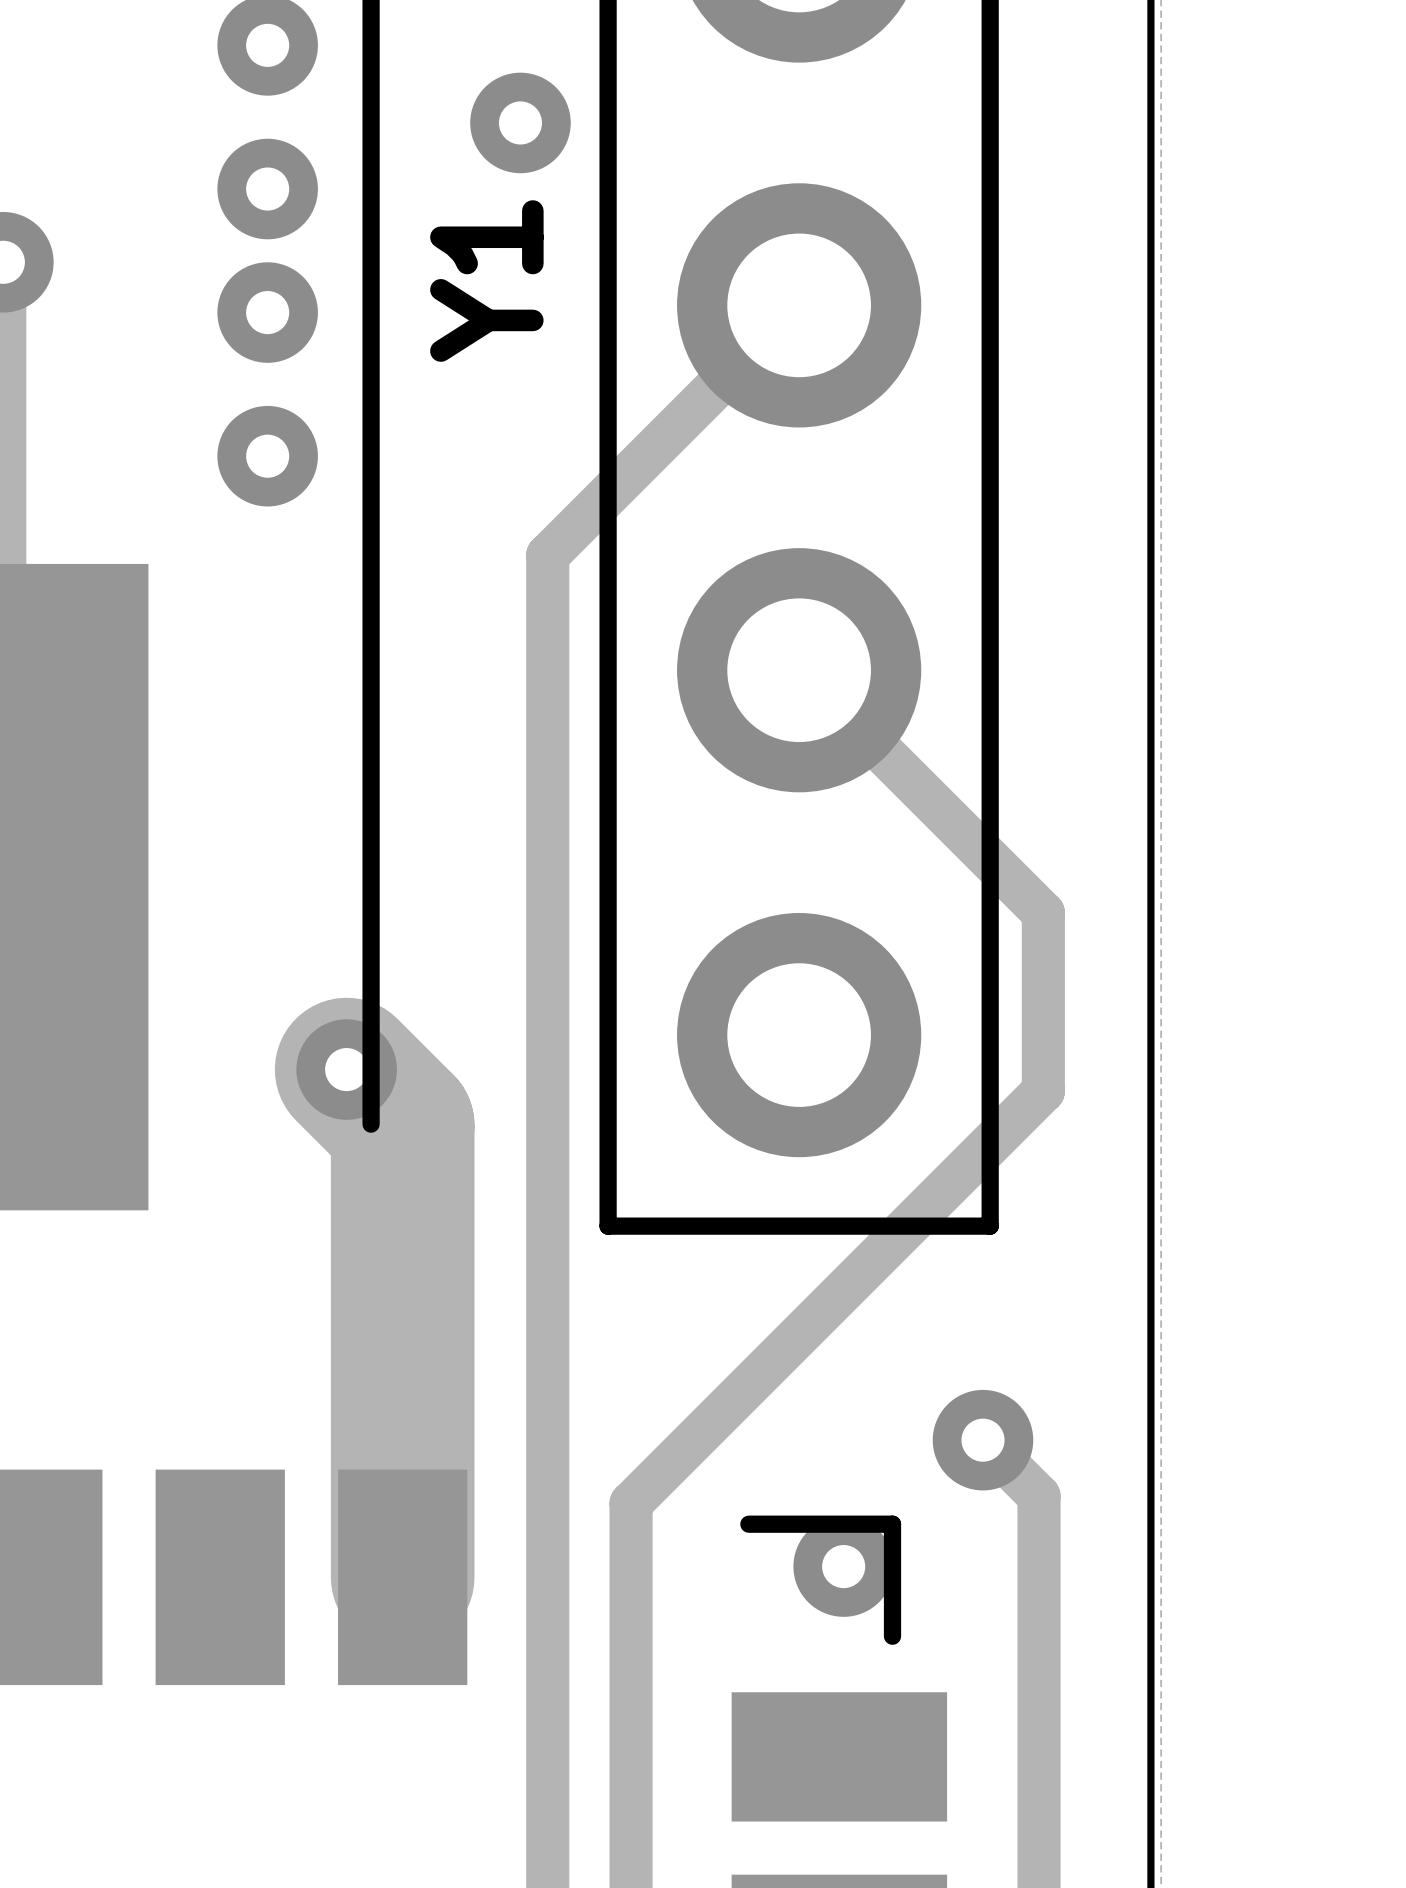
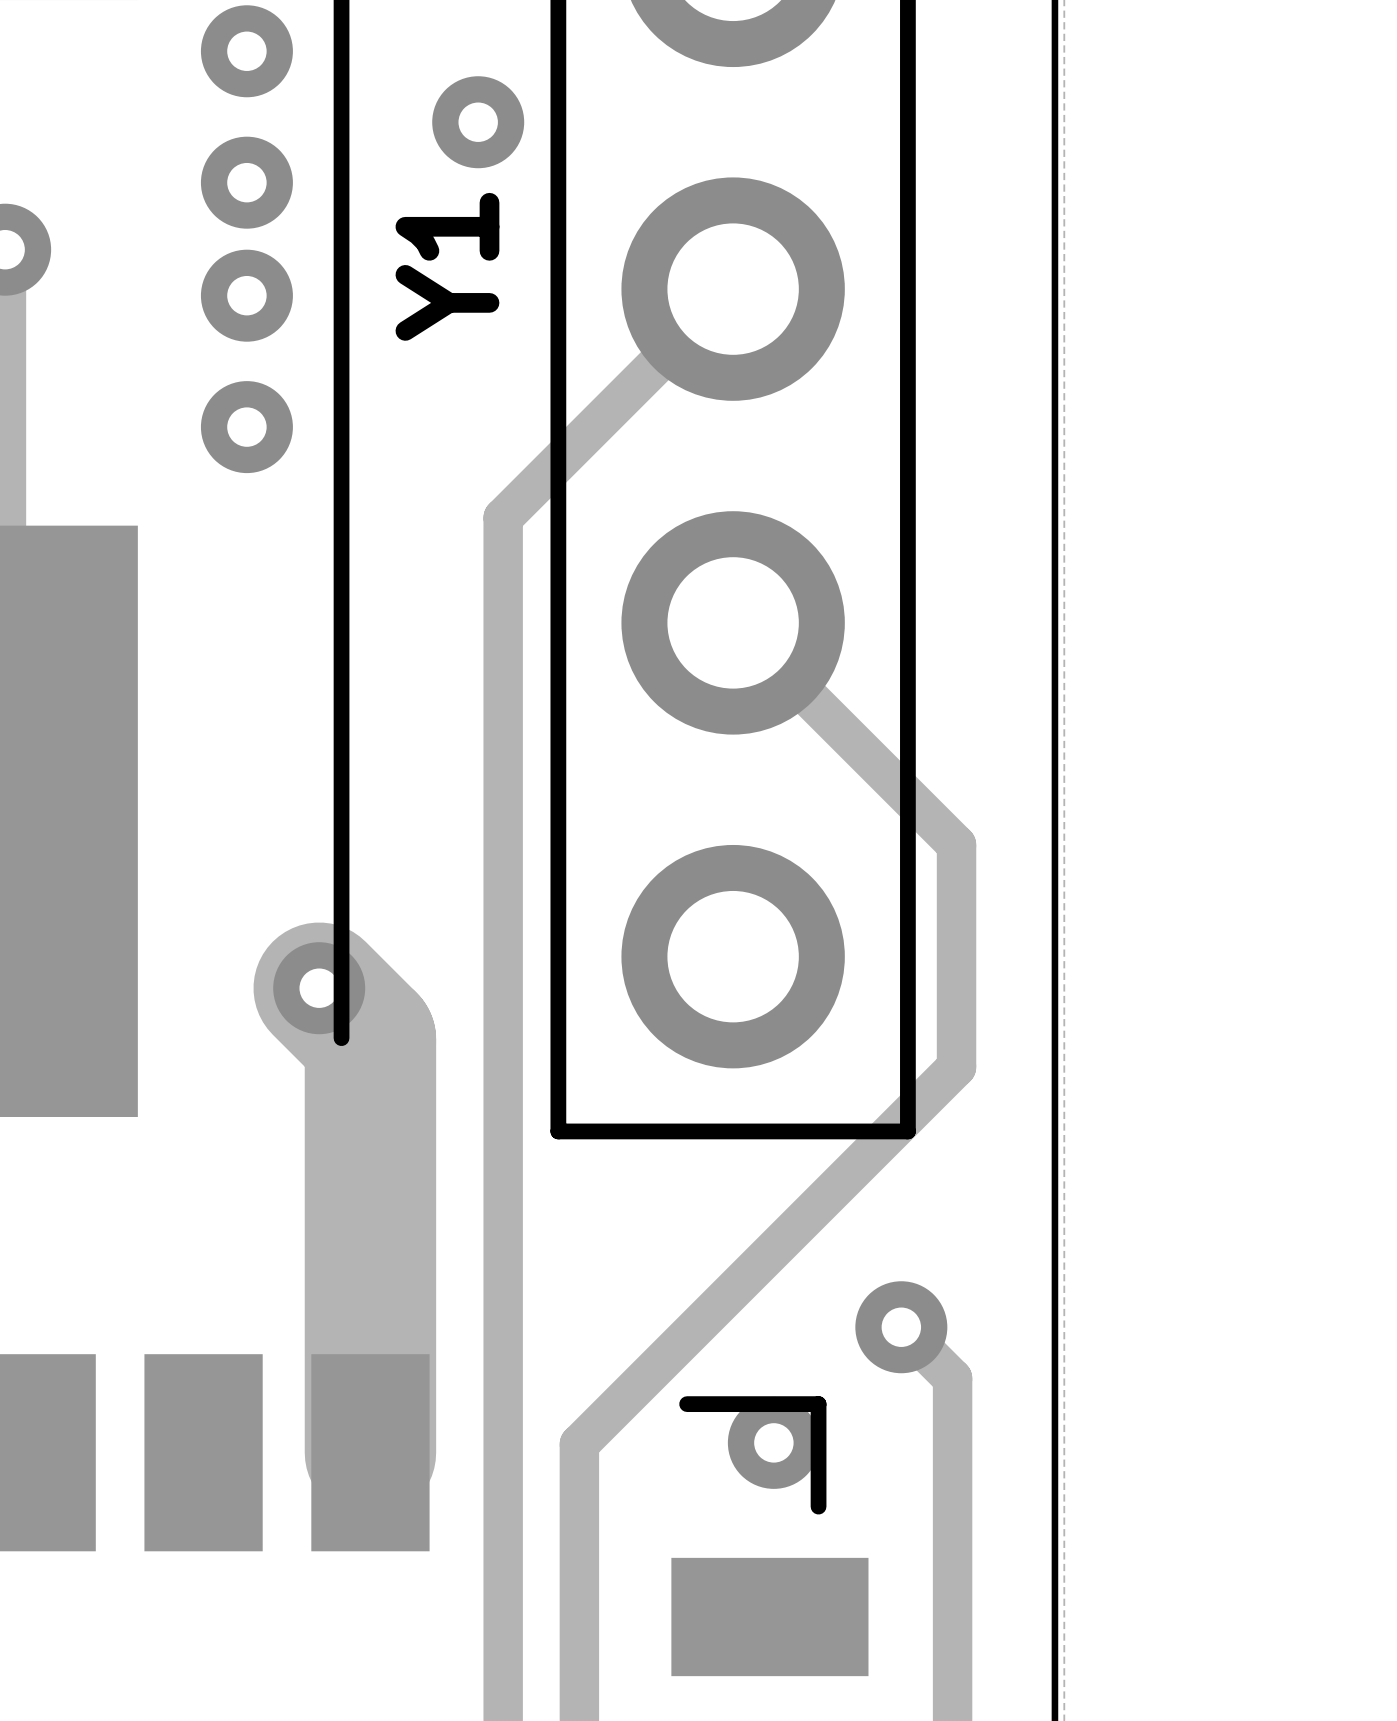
track: (1043, 1091) (631, 1503) (631, 1568) -> (956, 1007) (956, 1067) (579, 1444)

